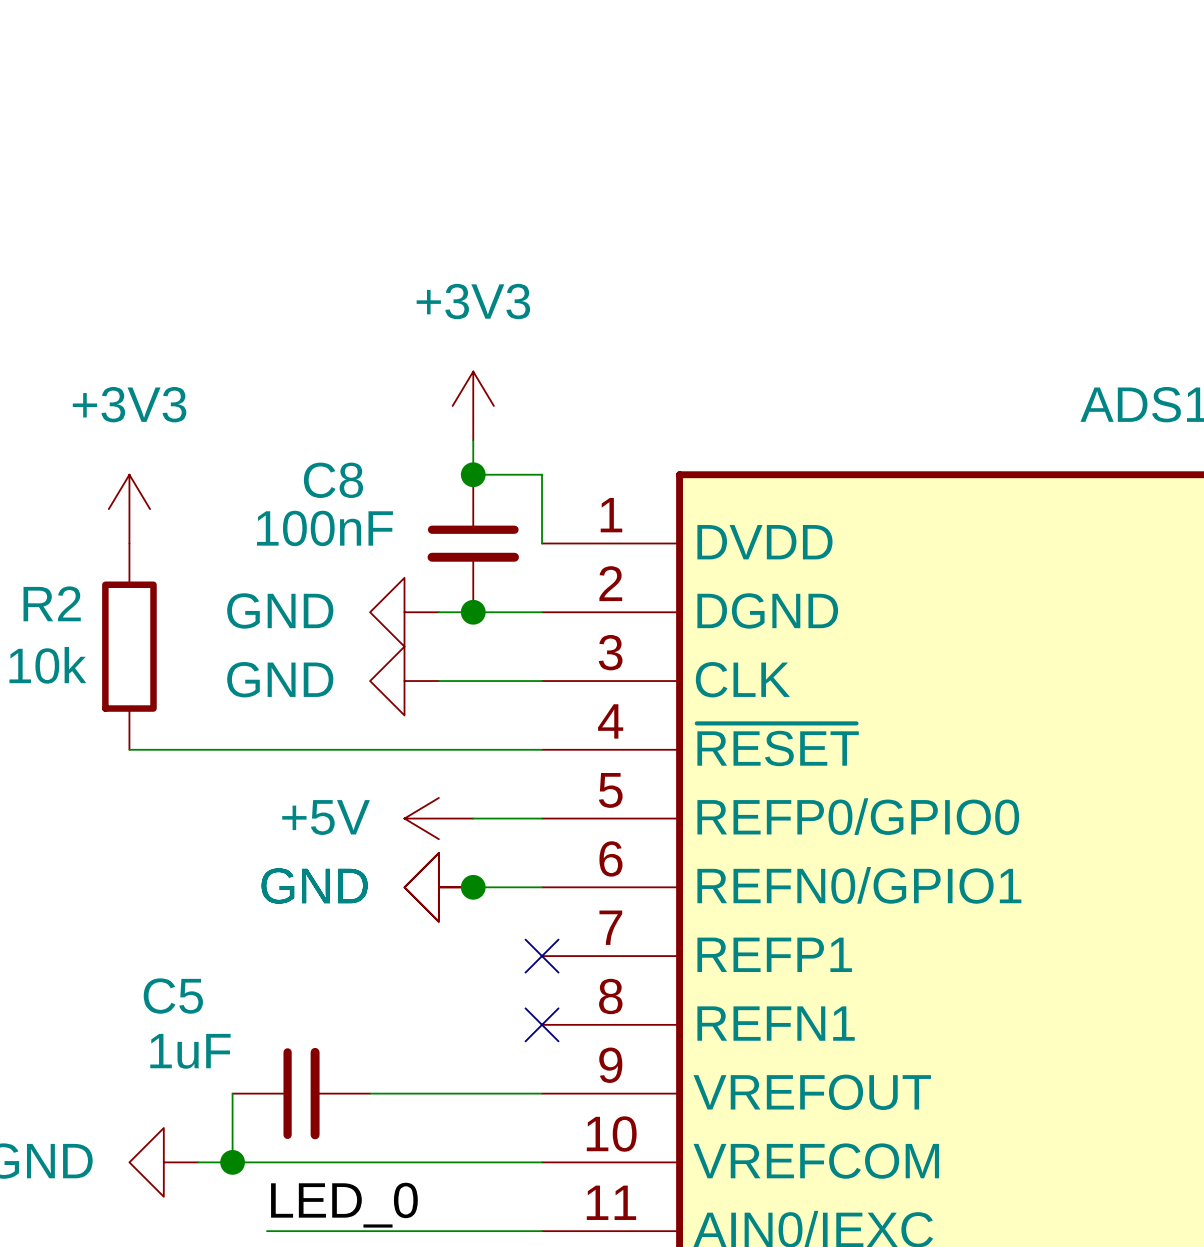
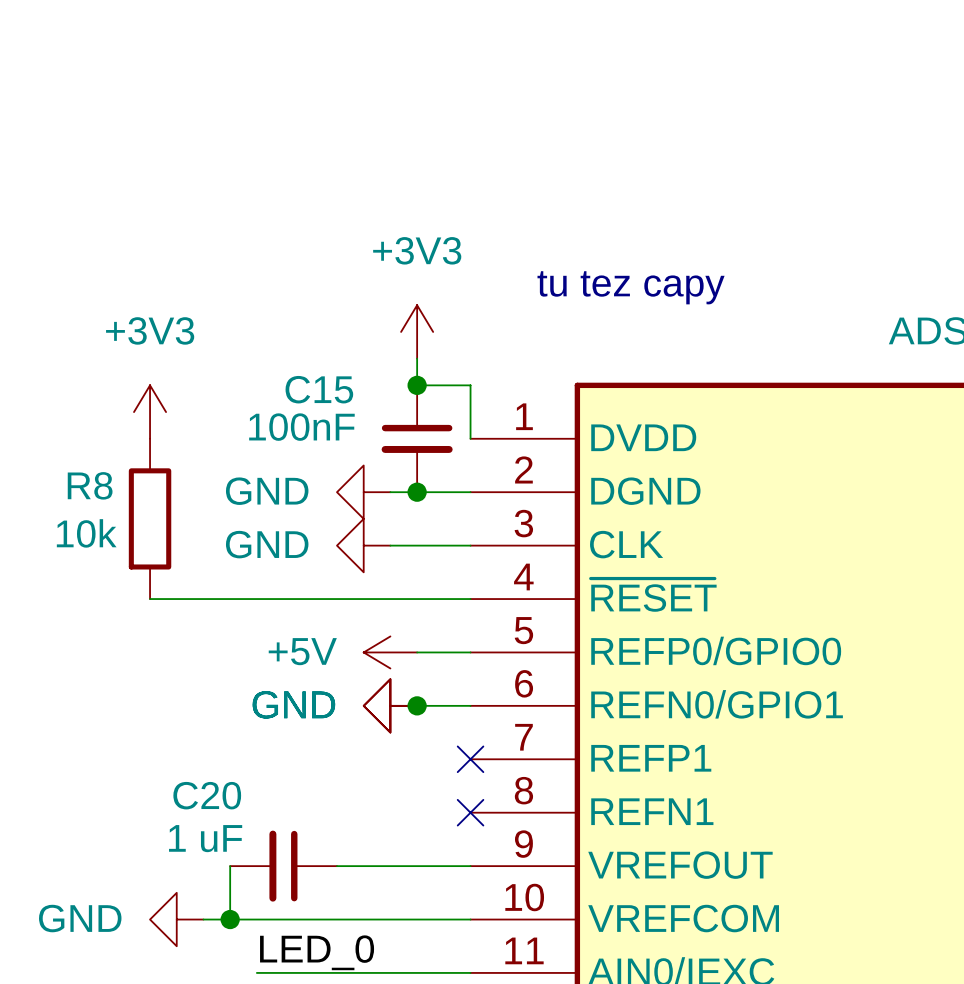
text: none -> tu tez capy (631, 287)
C8 name: C8 (333, 480) -> C15 (319, 389)
R2 name: R2 (52, 603) -> R8 (90, 485)
C5: 1uF (301, 1093) -> none
C20: none -> 1 uF (283, 866)

